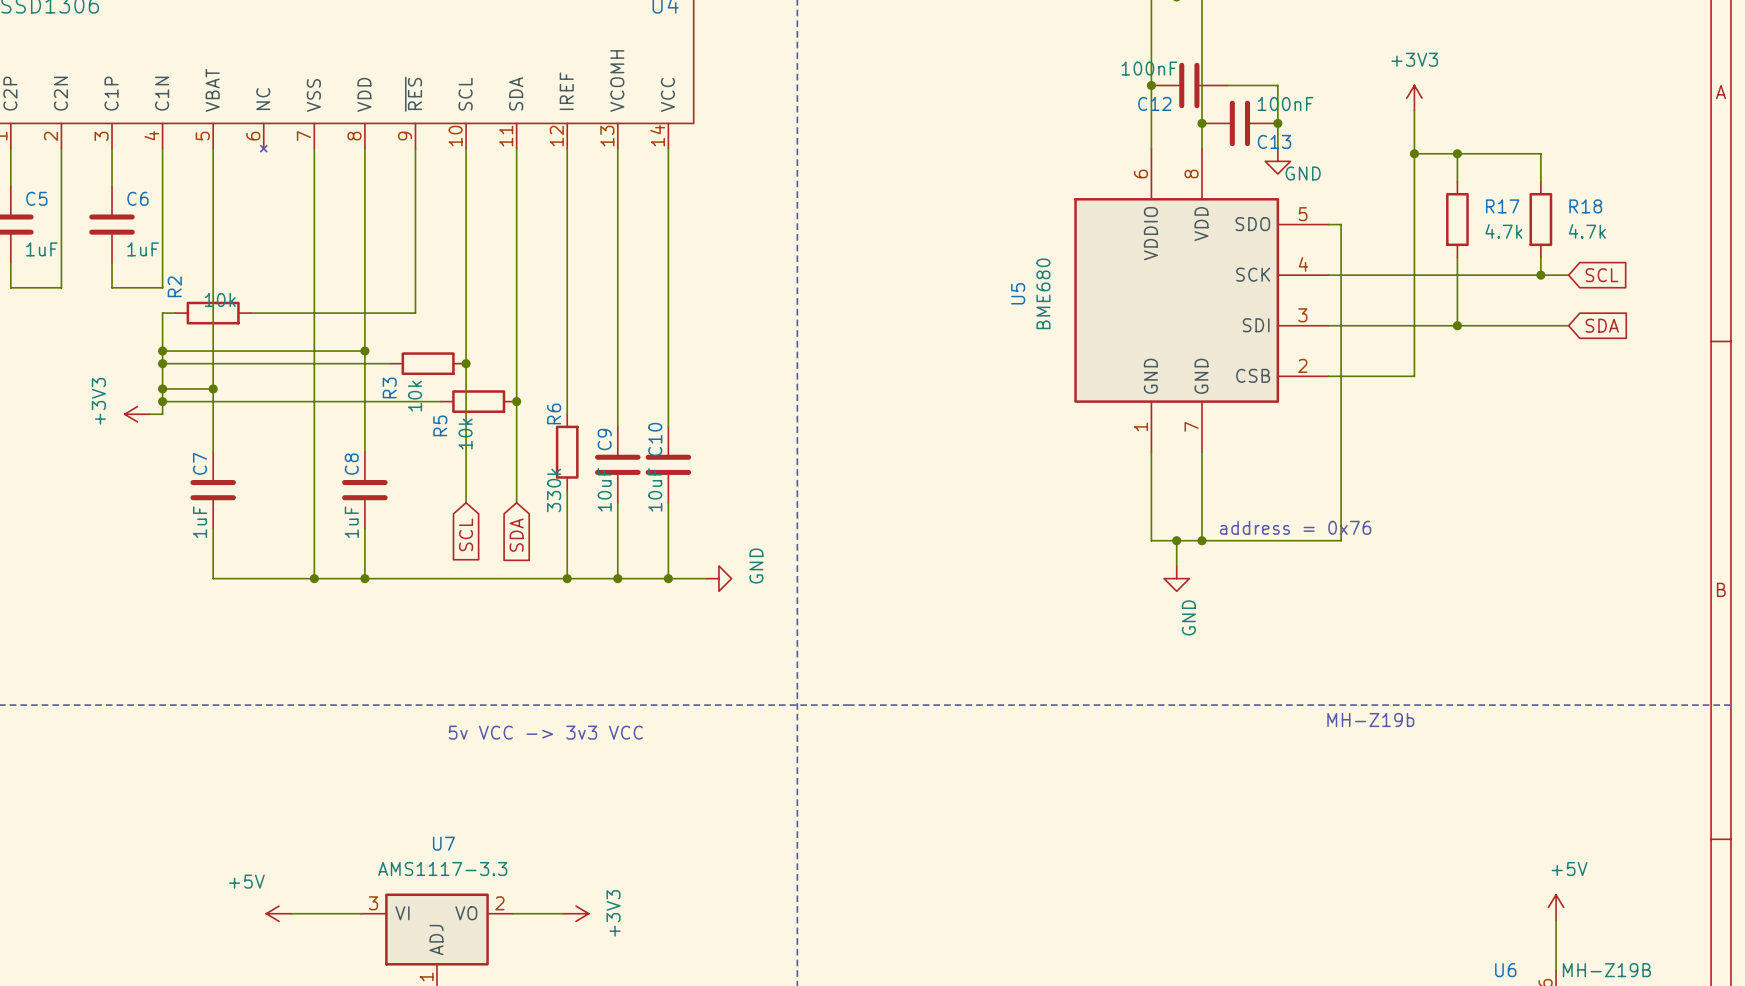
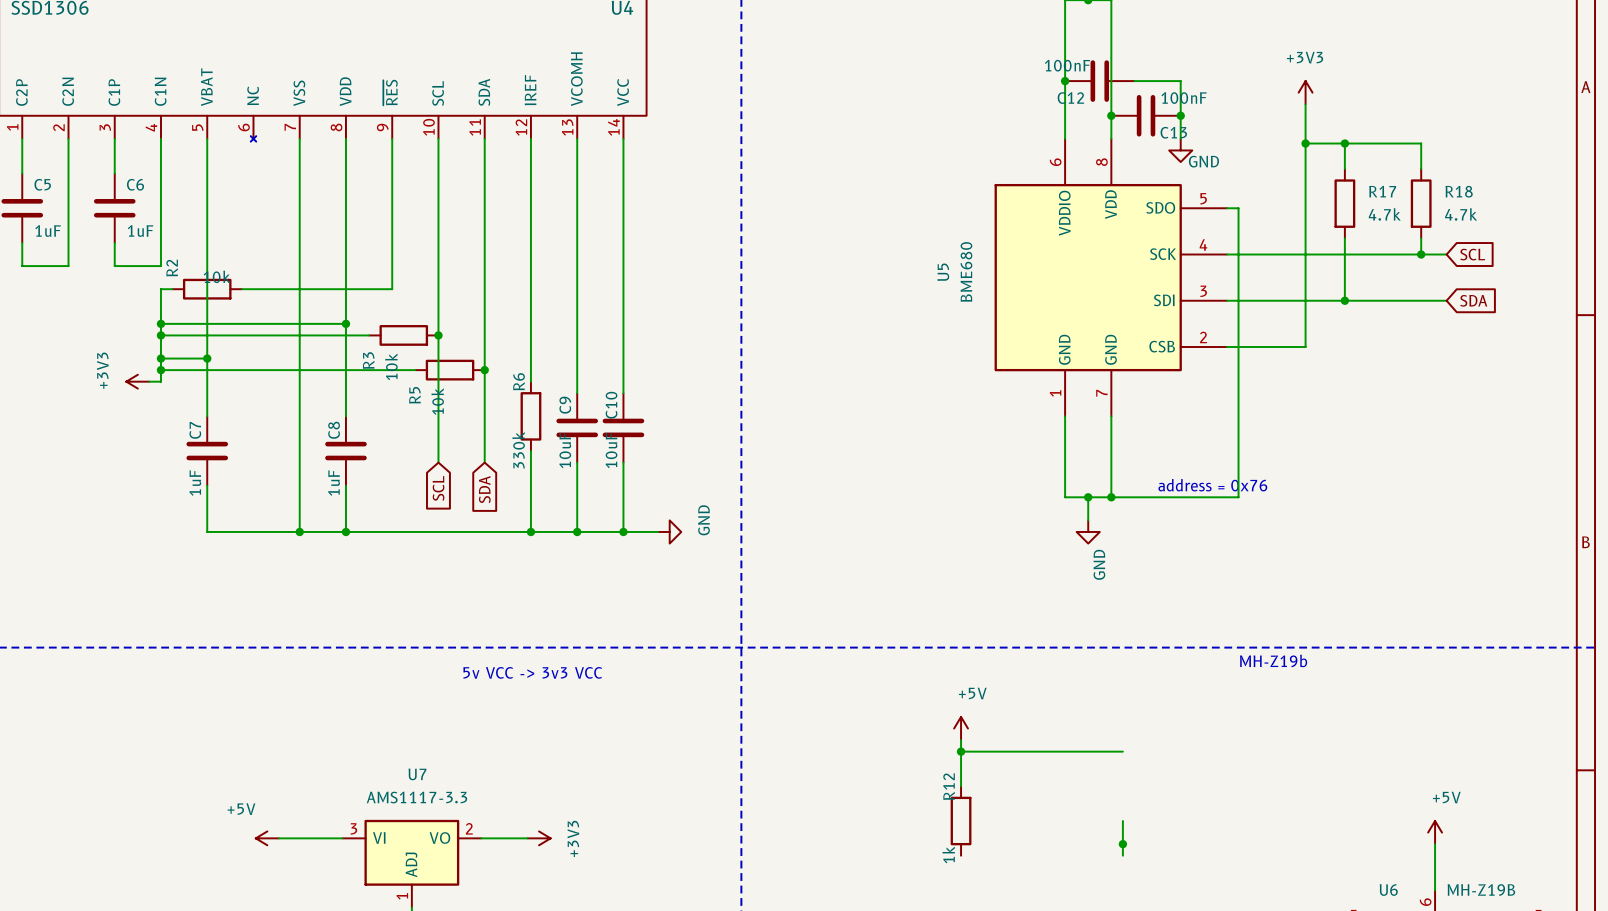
power symbol: none -> +5V (961, 728)
wire: none -> (961, 740) (961, 786)
wire: none -> (961, 751) (1122, 751)
junction: none -> (961, 751)
R12: none -> 1k (961, 821)
wire: none -> (1122, 821) (1122, 855)
junction: none -> (1122, 844)

